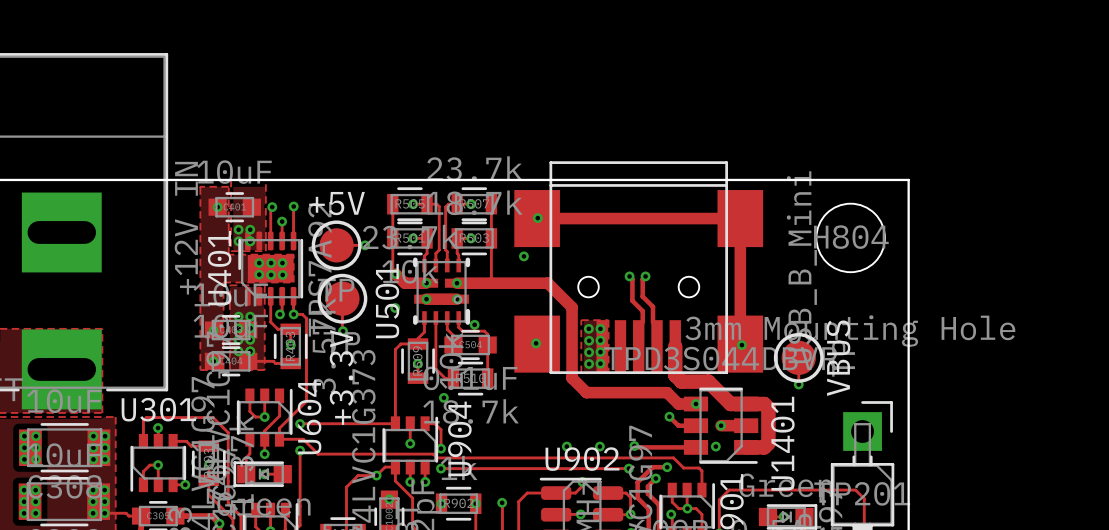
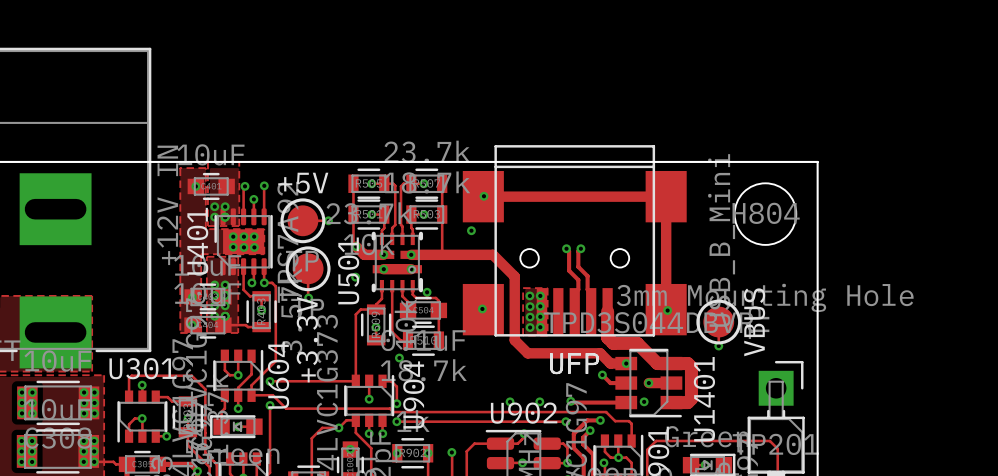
text: none -> UFP (574, 363)

